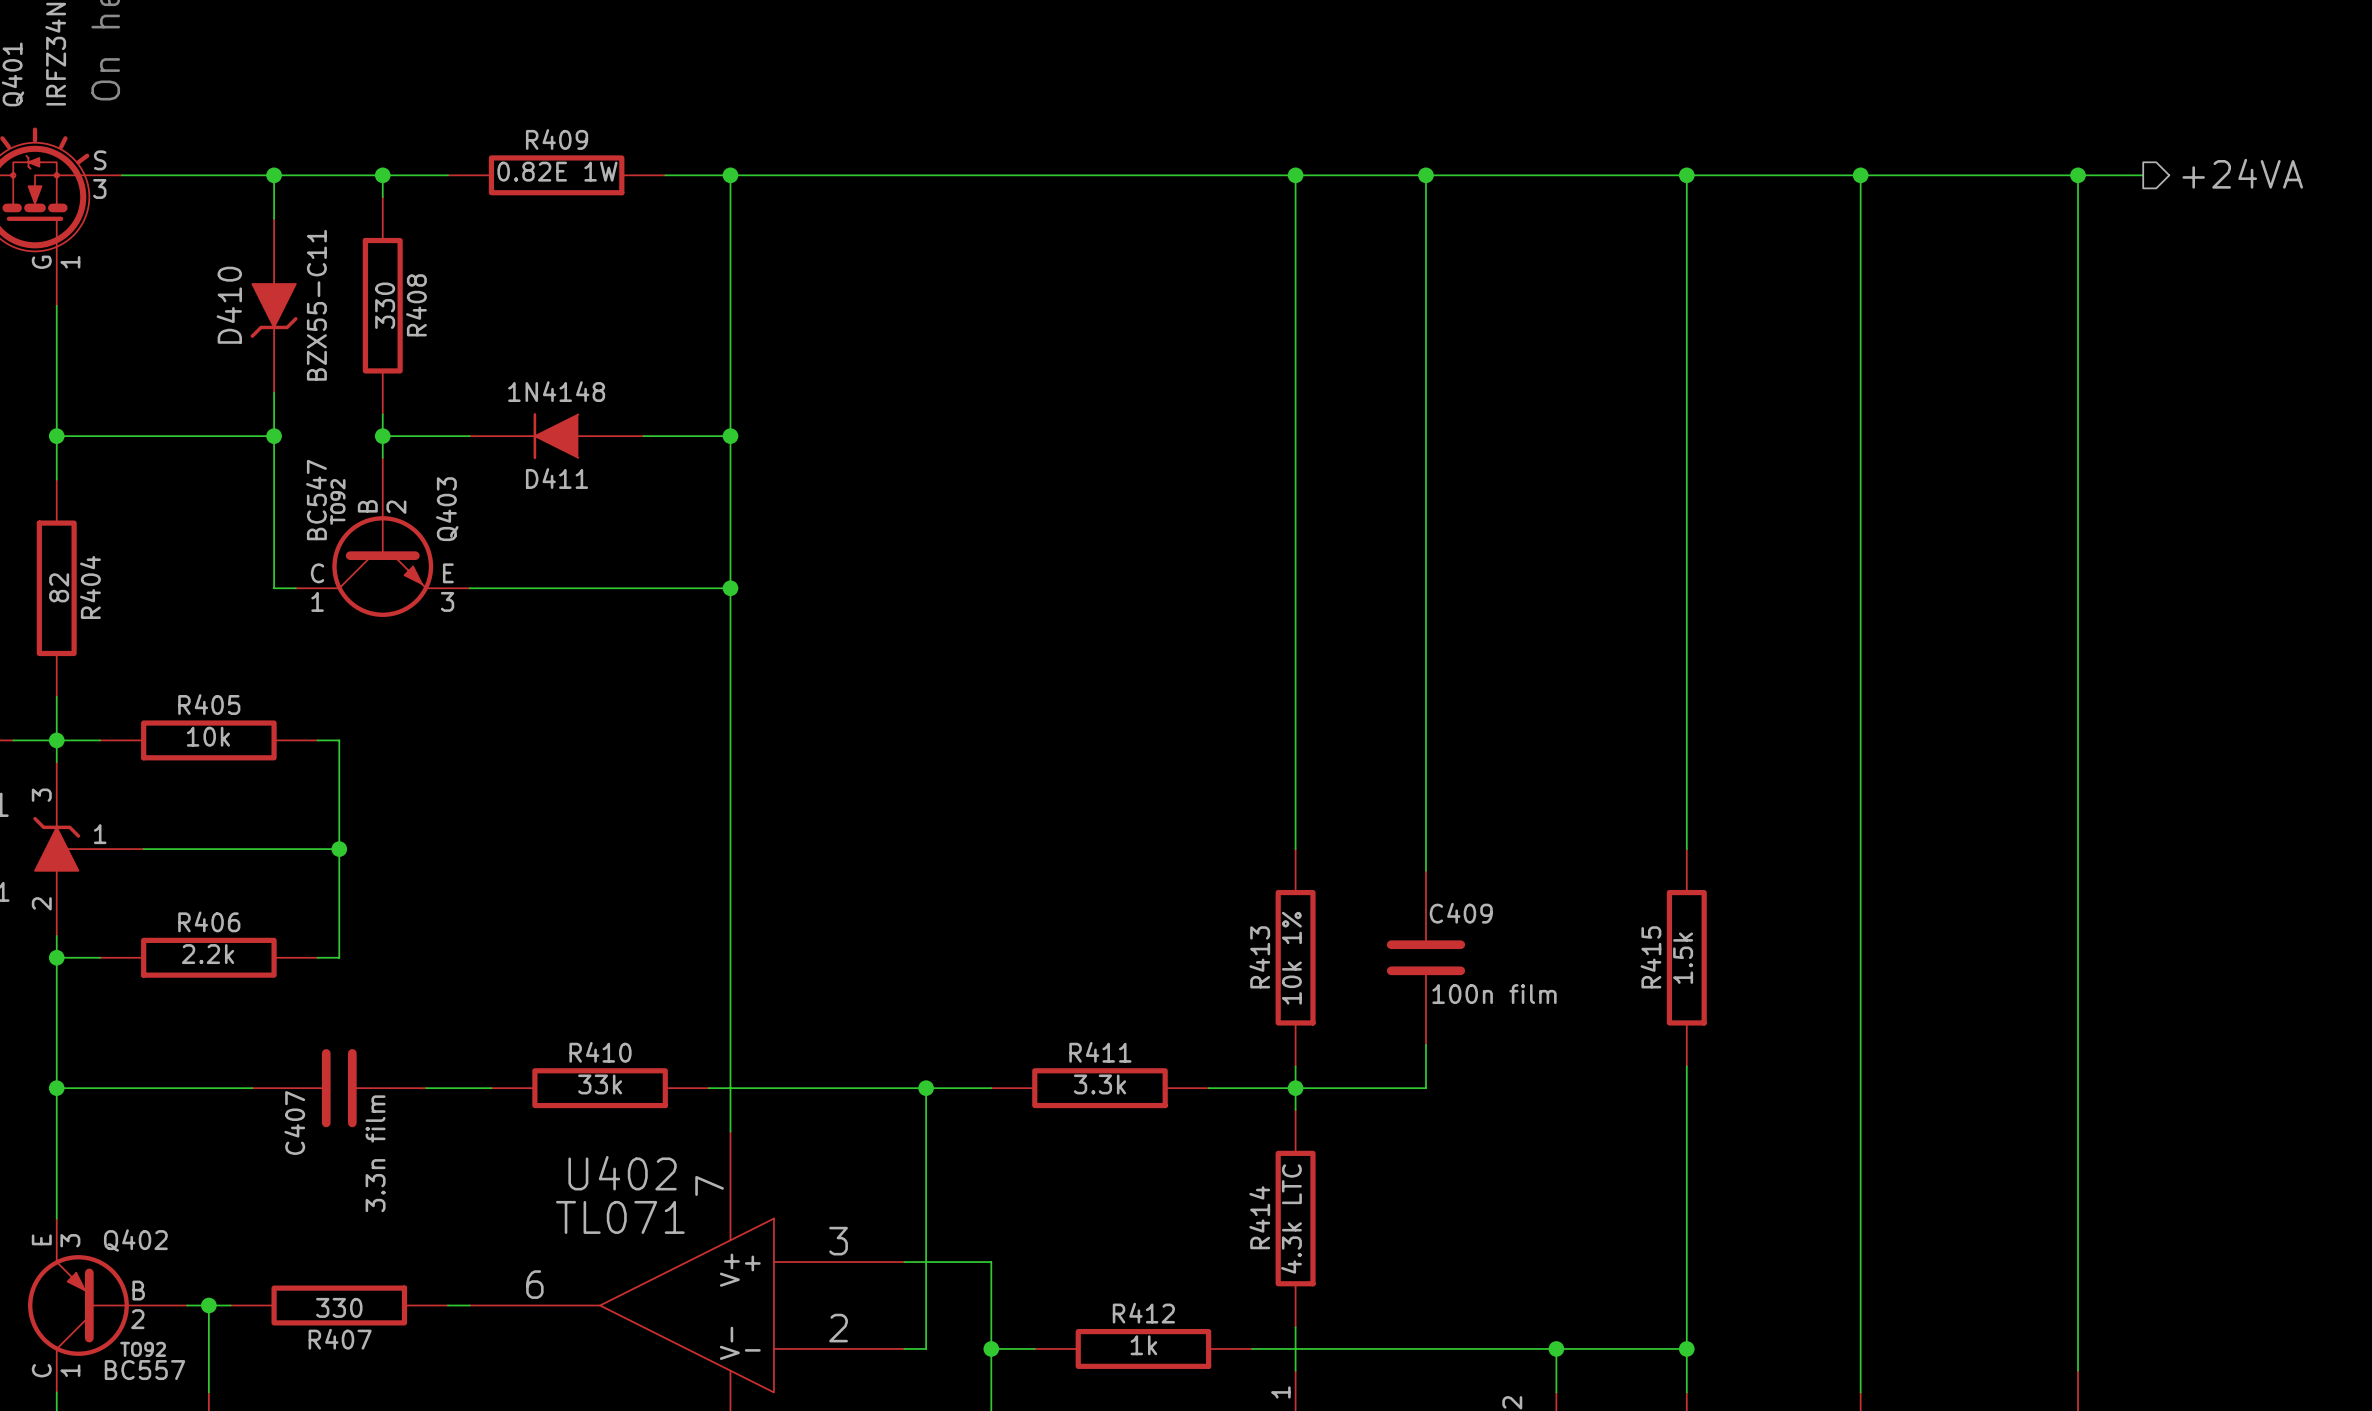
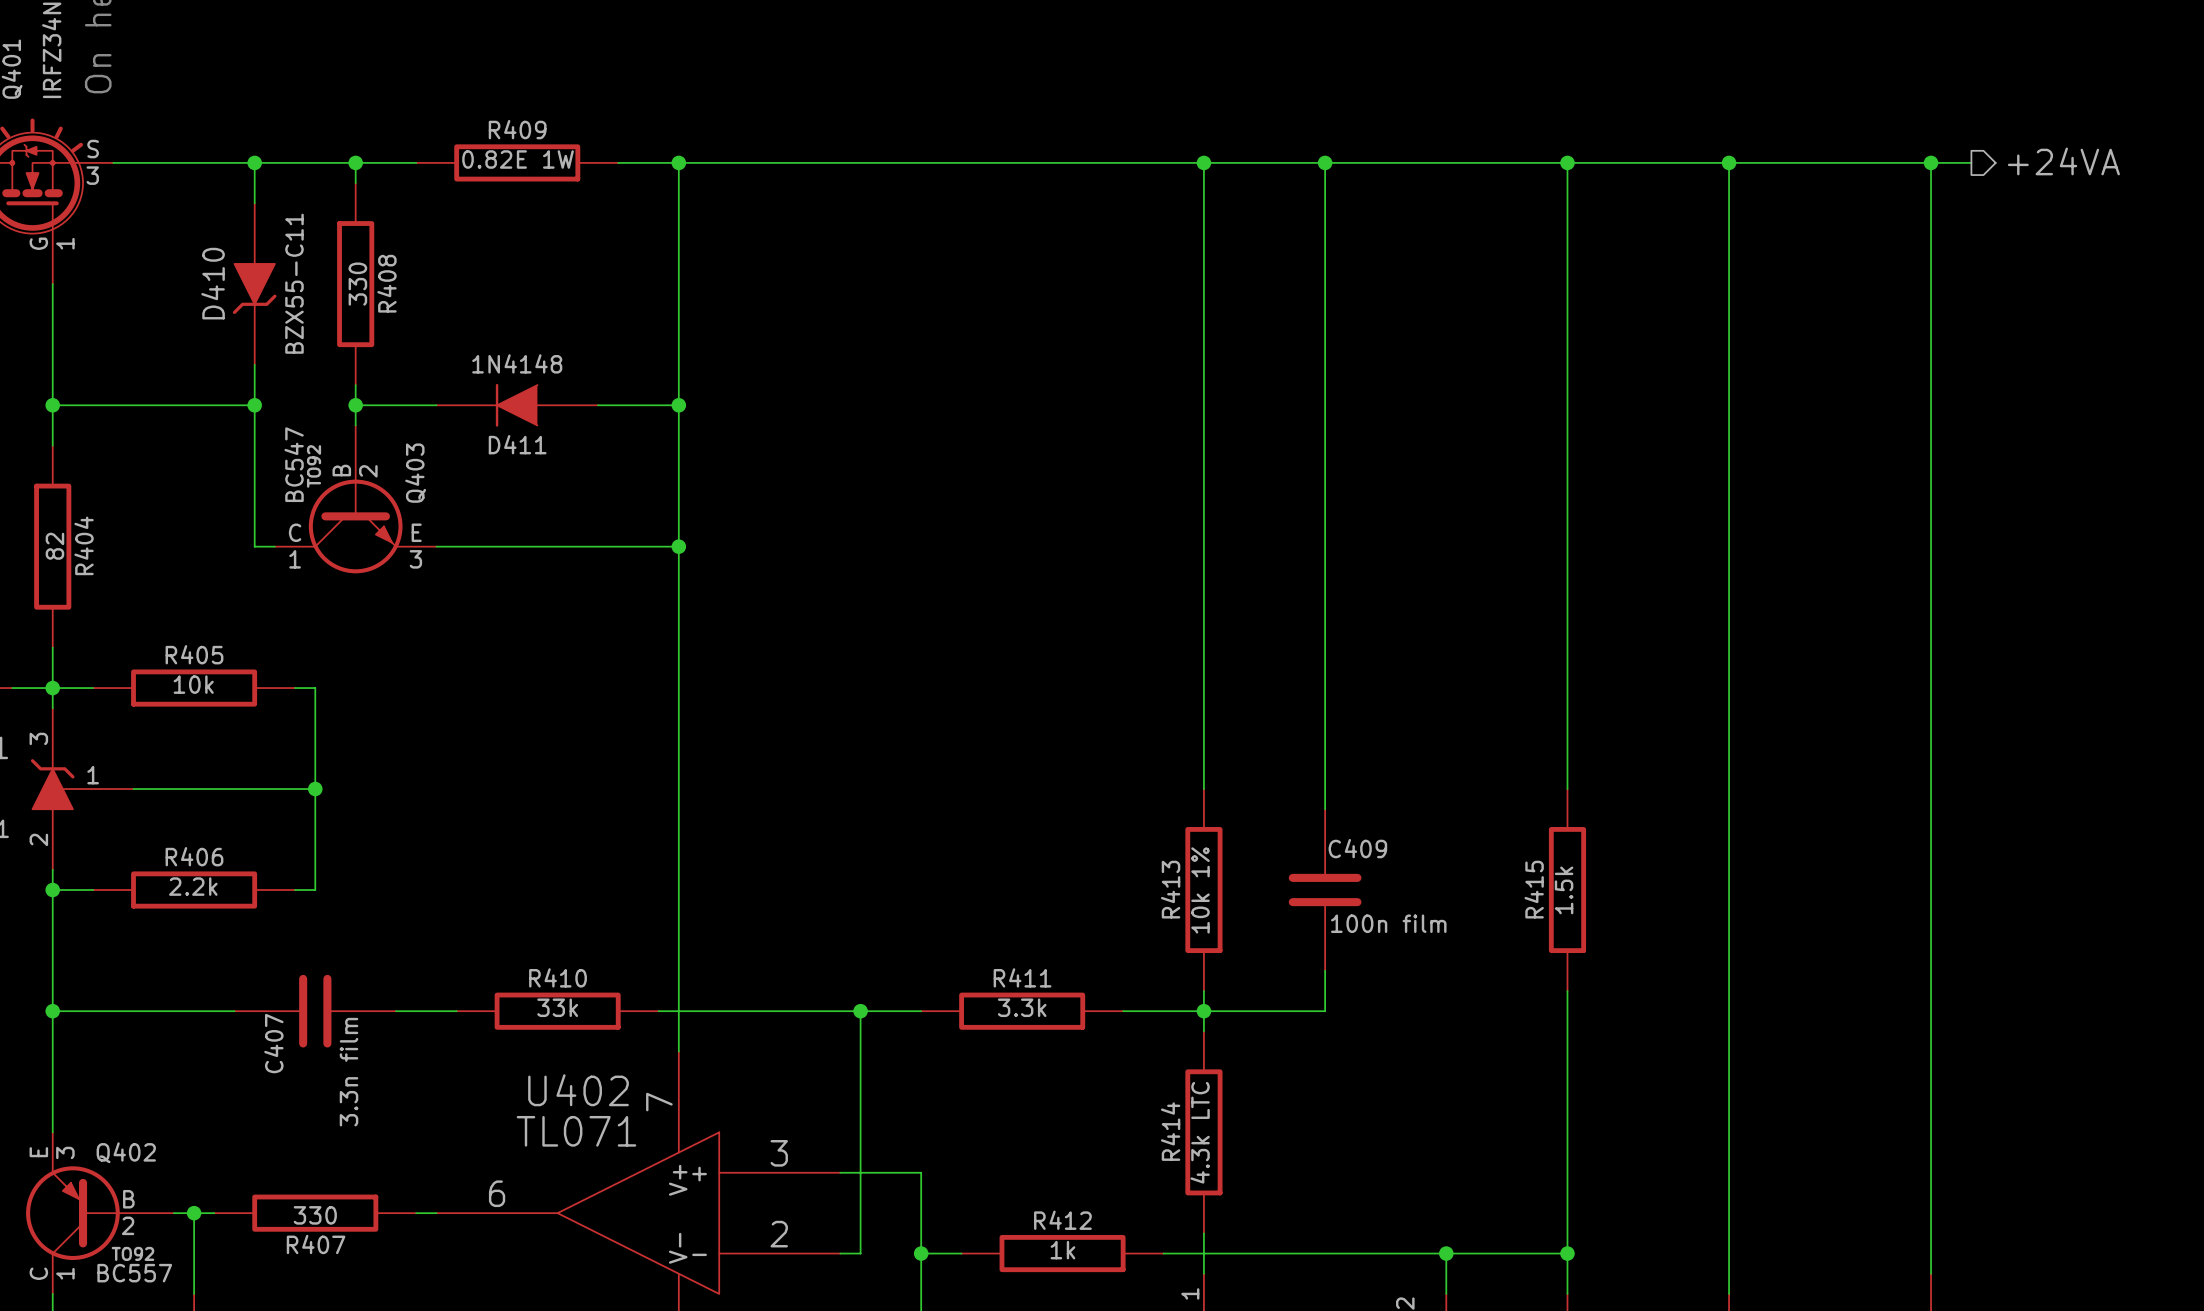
hierarchical label position: +24VA (2242, 173) -> +24VA (2063, 161)
wire: (2121, 175) (2143, 175) -> none

